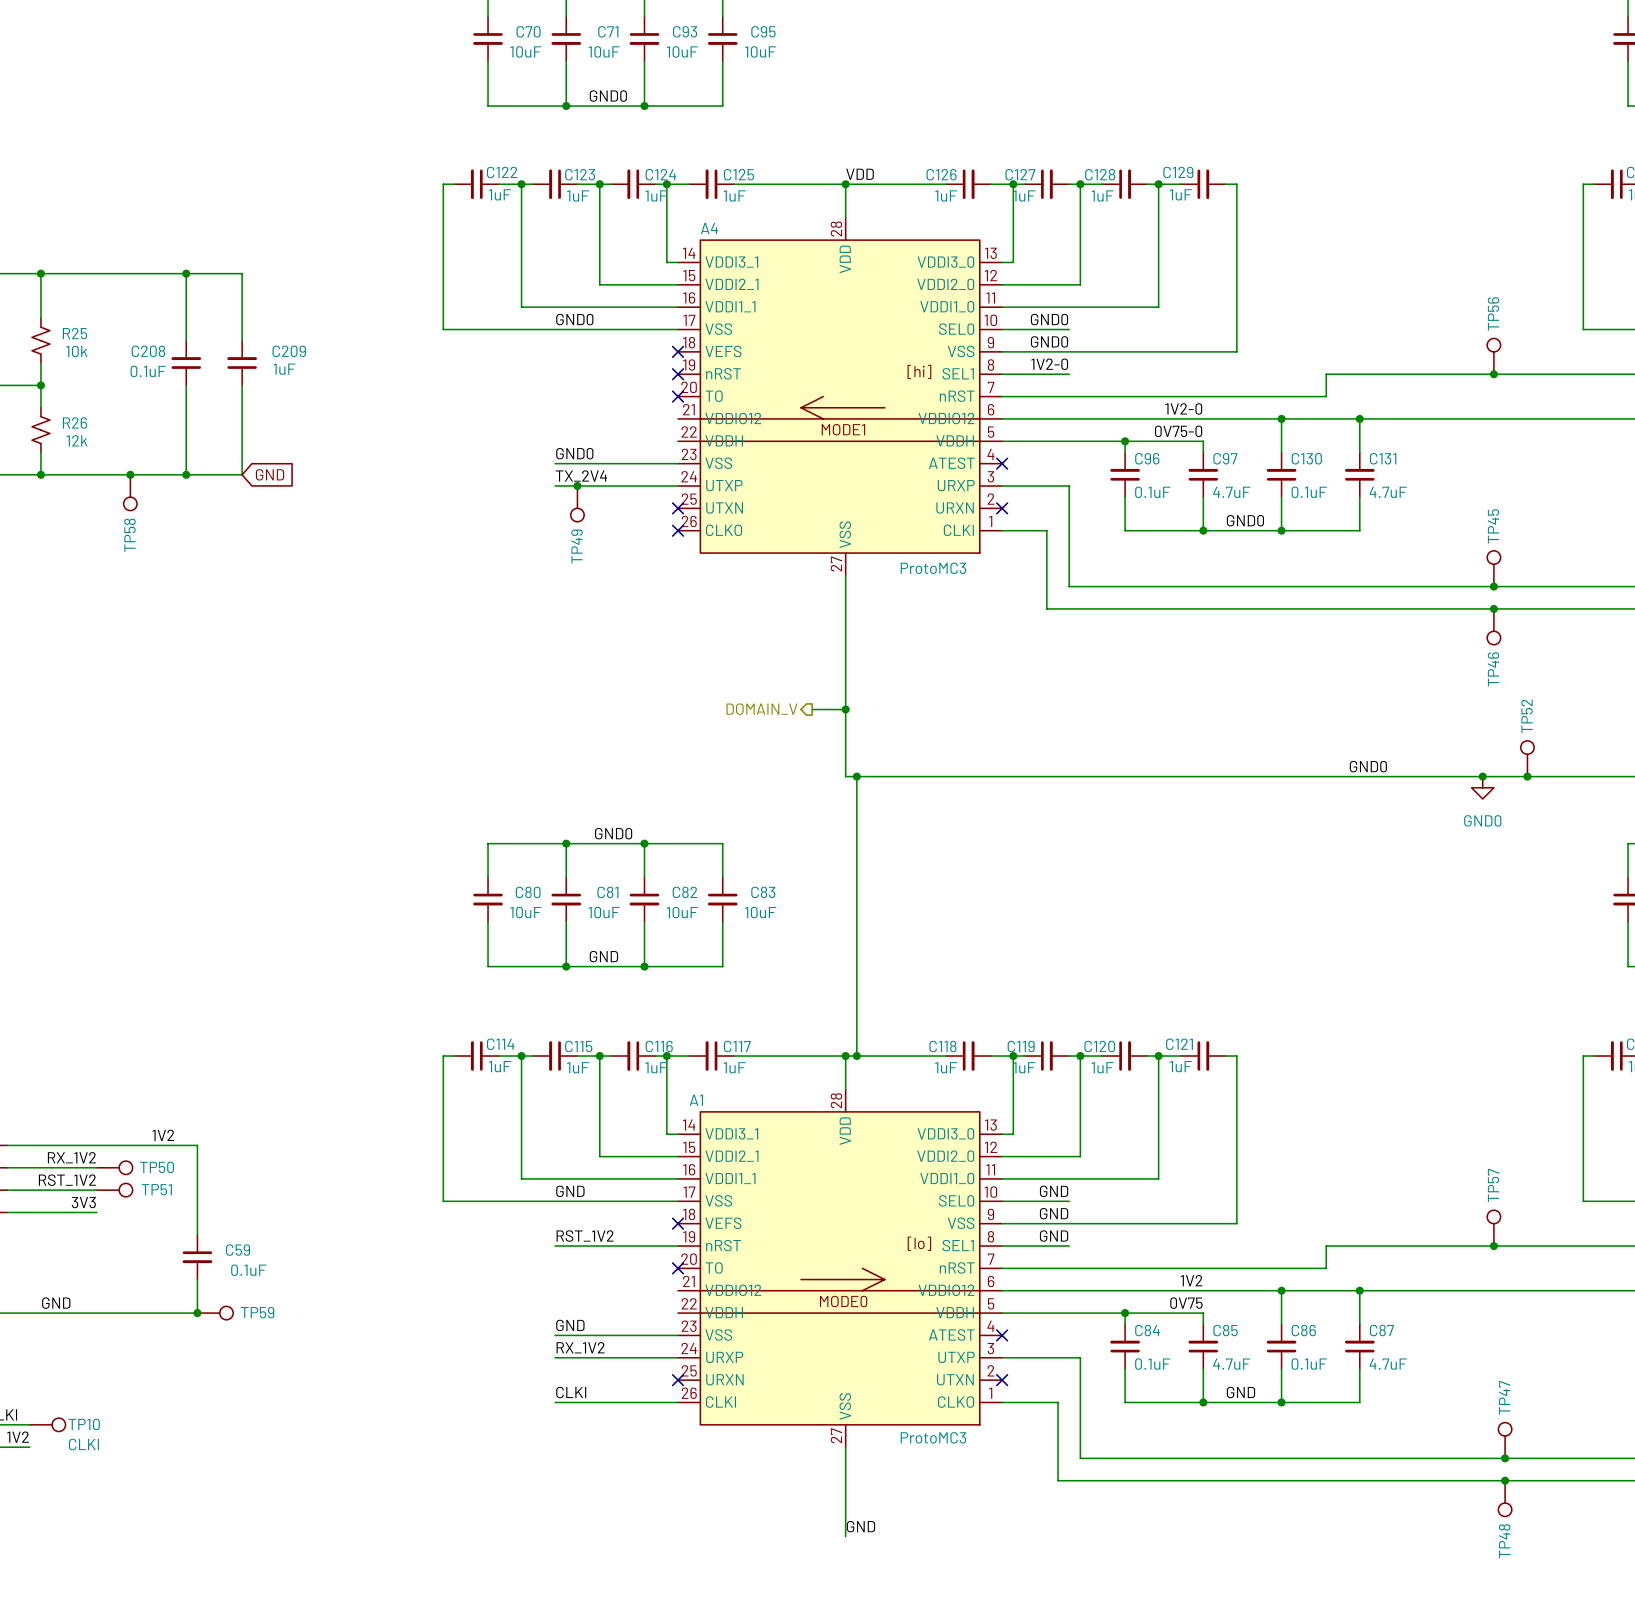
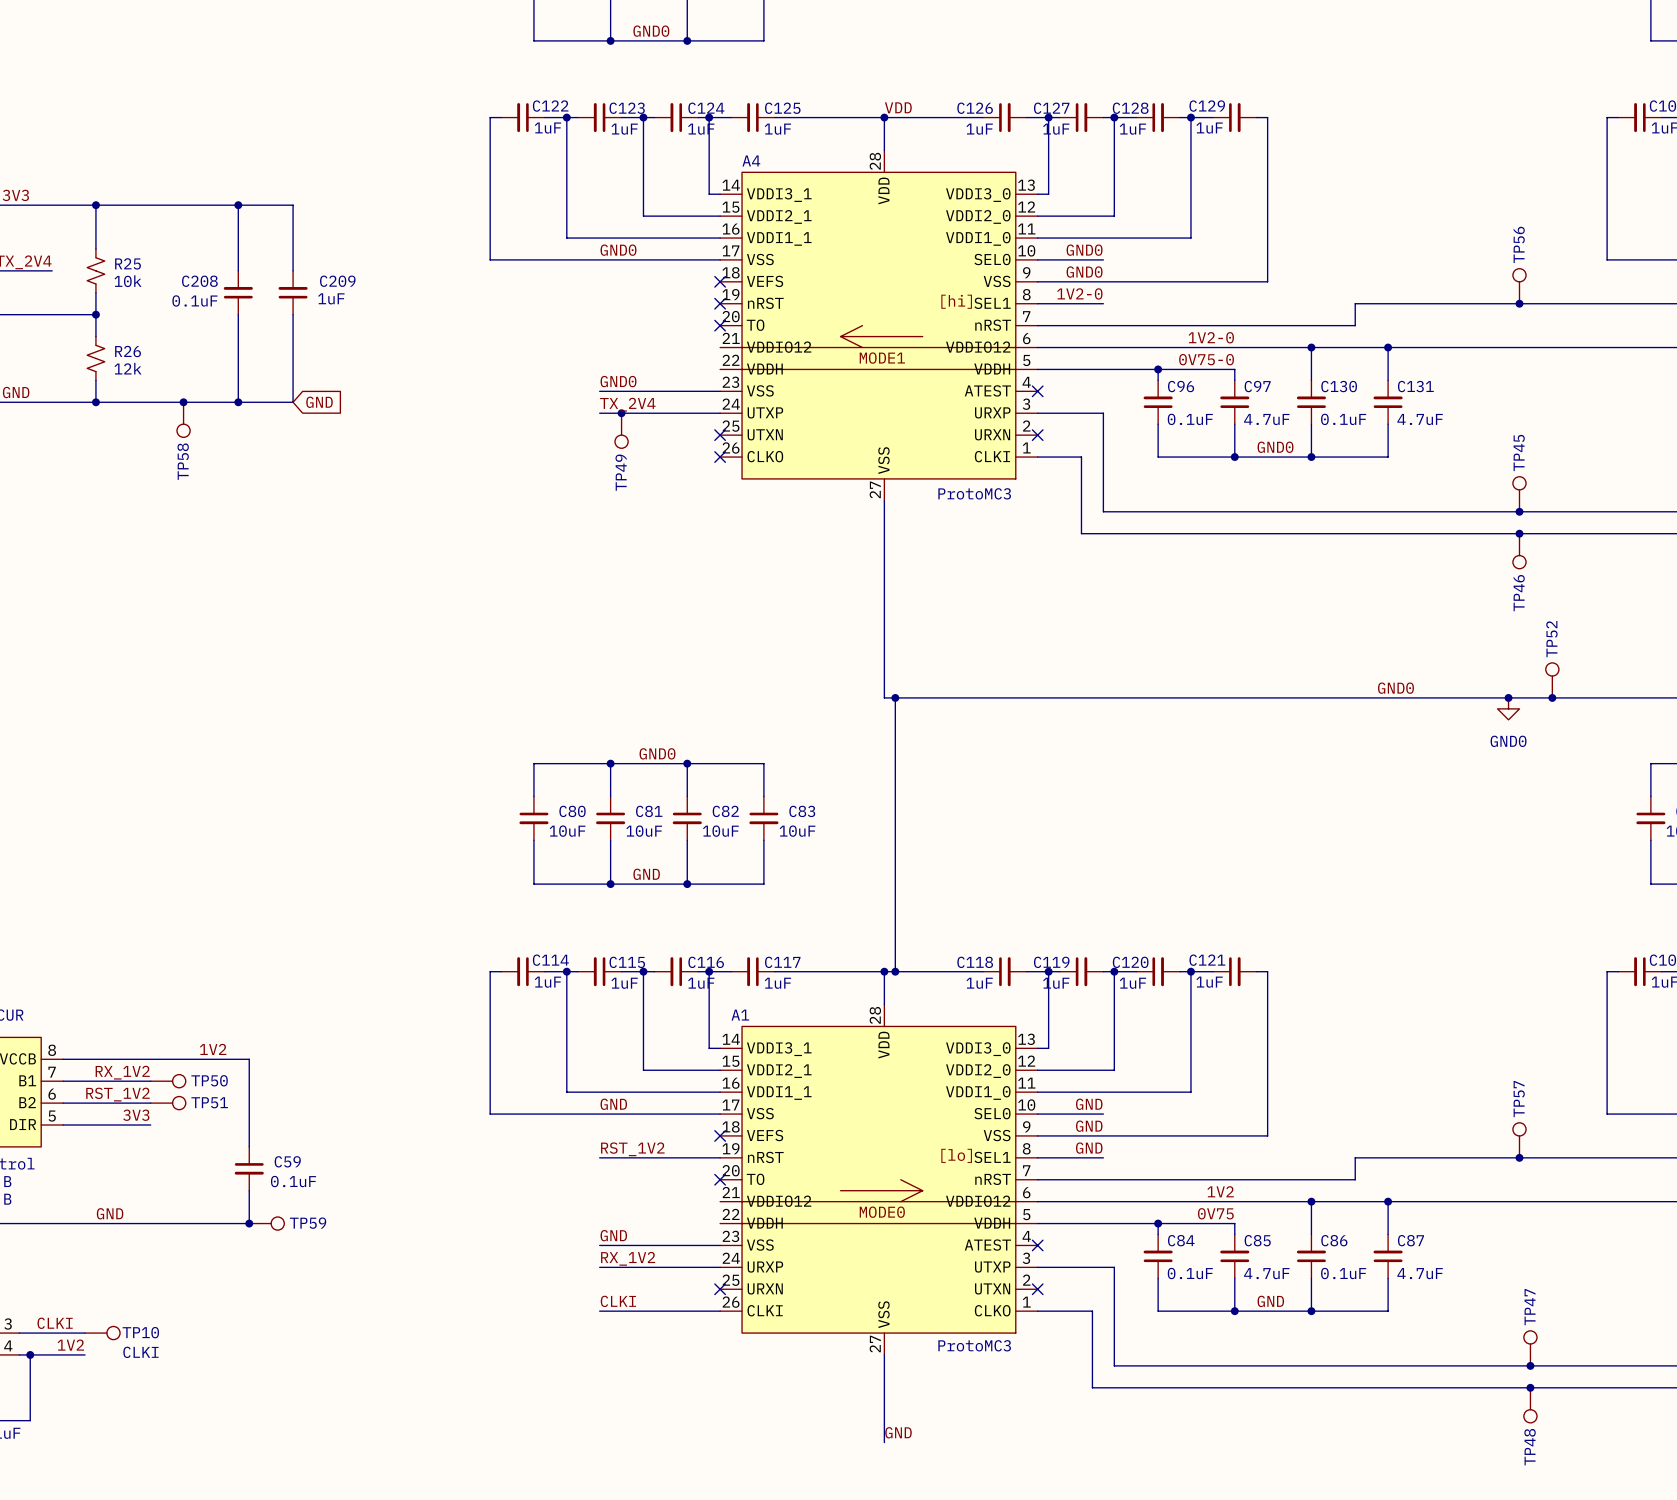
hierarchical label: DOMAIN_V (761, 709) -> none
wire: (812, 709) (845, 709) -> none
junction: (845, 709) -> none

